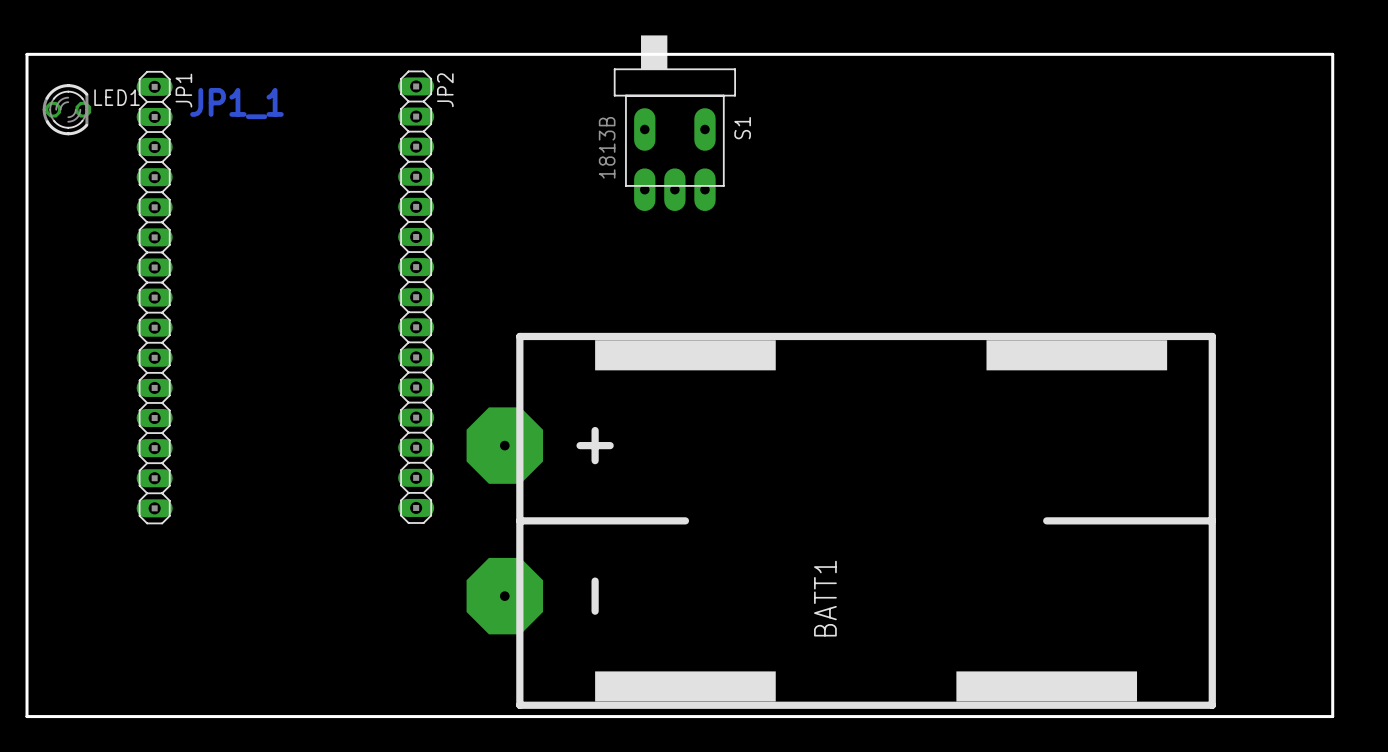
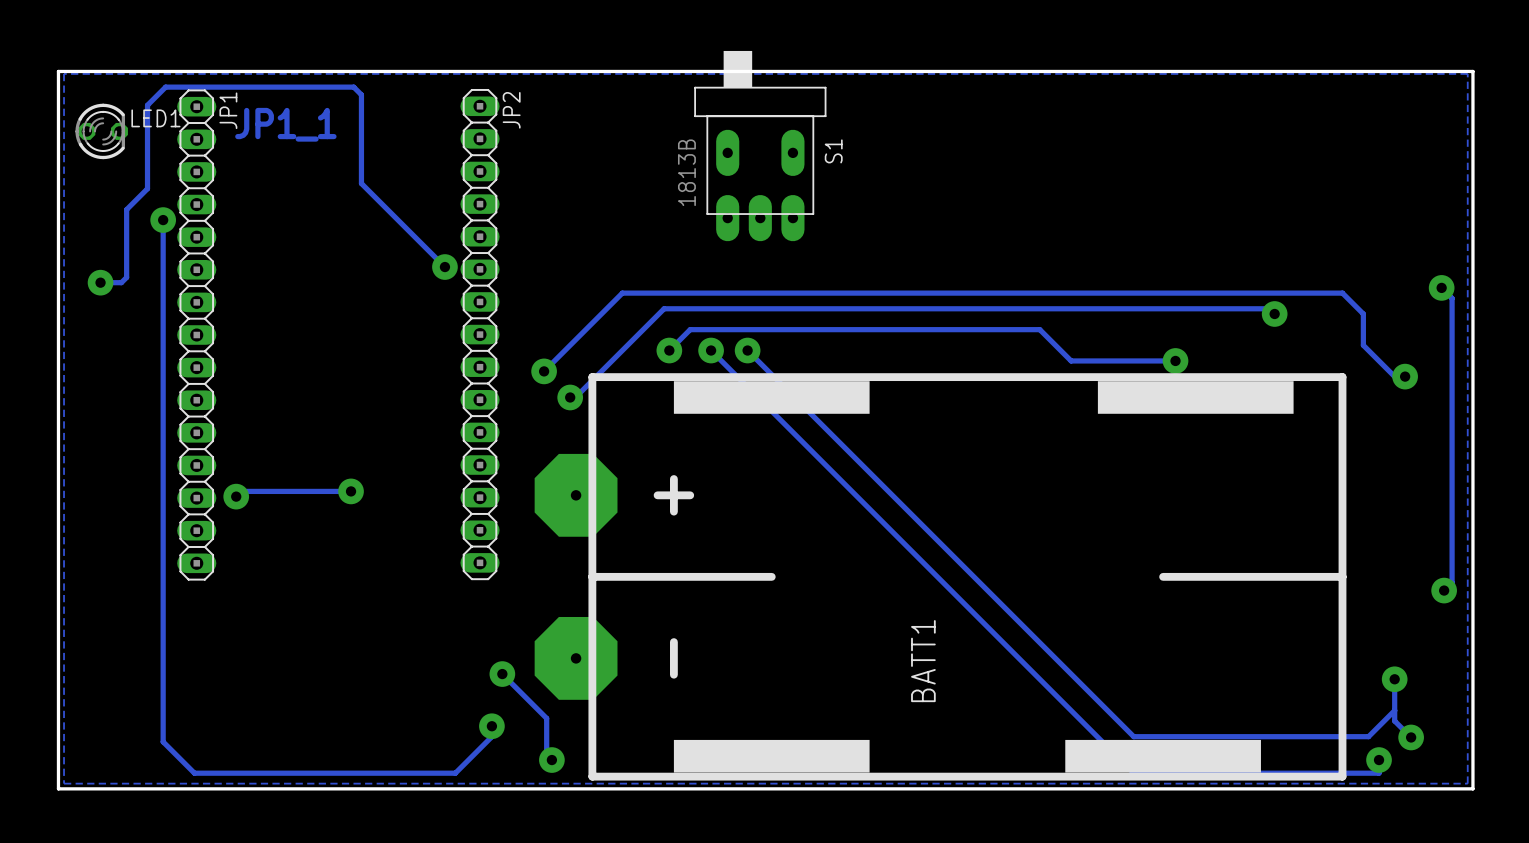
zone outline: none -> (1467, 73) (64, 73) (64, 783) (1467, 783) (1467, 73)
track: none -> (163, 220) (163, 741) (194, 773) (455, 773) (491, 736) (491, 726)
via: none -> (163, 220)
track: none -> (444, 267) (361, 183) (361, 94) (353, 87) (165, 87) (147, 105) (147, 188) (126, 209) (126, 277) (121, 282) (100, 282)
via: none -> (444, 267)
via: none -> (100, 282)
track: none -> (1441, 287) (1452, 298) (1452, 582) (1444, 590)
via: none -> (1441, 287)
track: none -> (1274, 313) (1274, 308) (664, 308) (575, 397) (570, 397)
via: none -> (1274, 313)
track: none -> (669, 350) (690, 329) (1039, 329) (1071, 360) (1175, 360)
via: none -> (669, 350)
track: none -> (711, 350) (1133, 773) (1379, 773) (1379, 760)
via: none -> (711, 350)
track: none -> (747, 350) (1133, 736) (1368, 736) (1394, 710)
via: none -> (747, 350)
via: none -> (1175, 360)
via: none -> (544, 371)
track: none -> (1405, 376) (1394, 376) (1363, 345) (1363, 313) (1342, 293) (622, 293) (538, 376)
via: none -> (1405, 376)
via: none -> (570, 397)
track: none -> (351, 491) (241, 491) (236, 496)
via: none -> (351, 491)
via: none -> (236, 496)
via: none -> (1444, 590)
track: none -> (502, 674) (546, 718) (546, 754) (551, 760)
via: none -> (502, 674)
track: none -> (1394, 679) (1394, 721) (1411, 737)
via: none -> (1394, 679)
via: none -> (491, 726)
via: none -> (1411, 737)
via: none -> (551, 760)
via: none -> (1379, 760)

